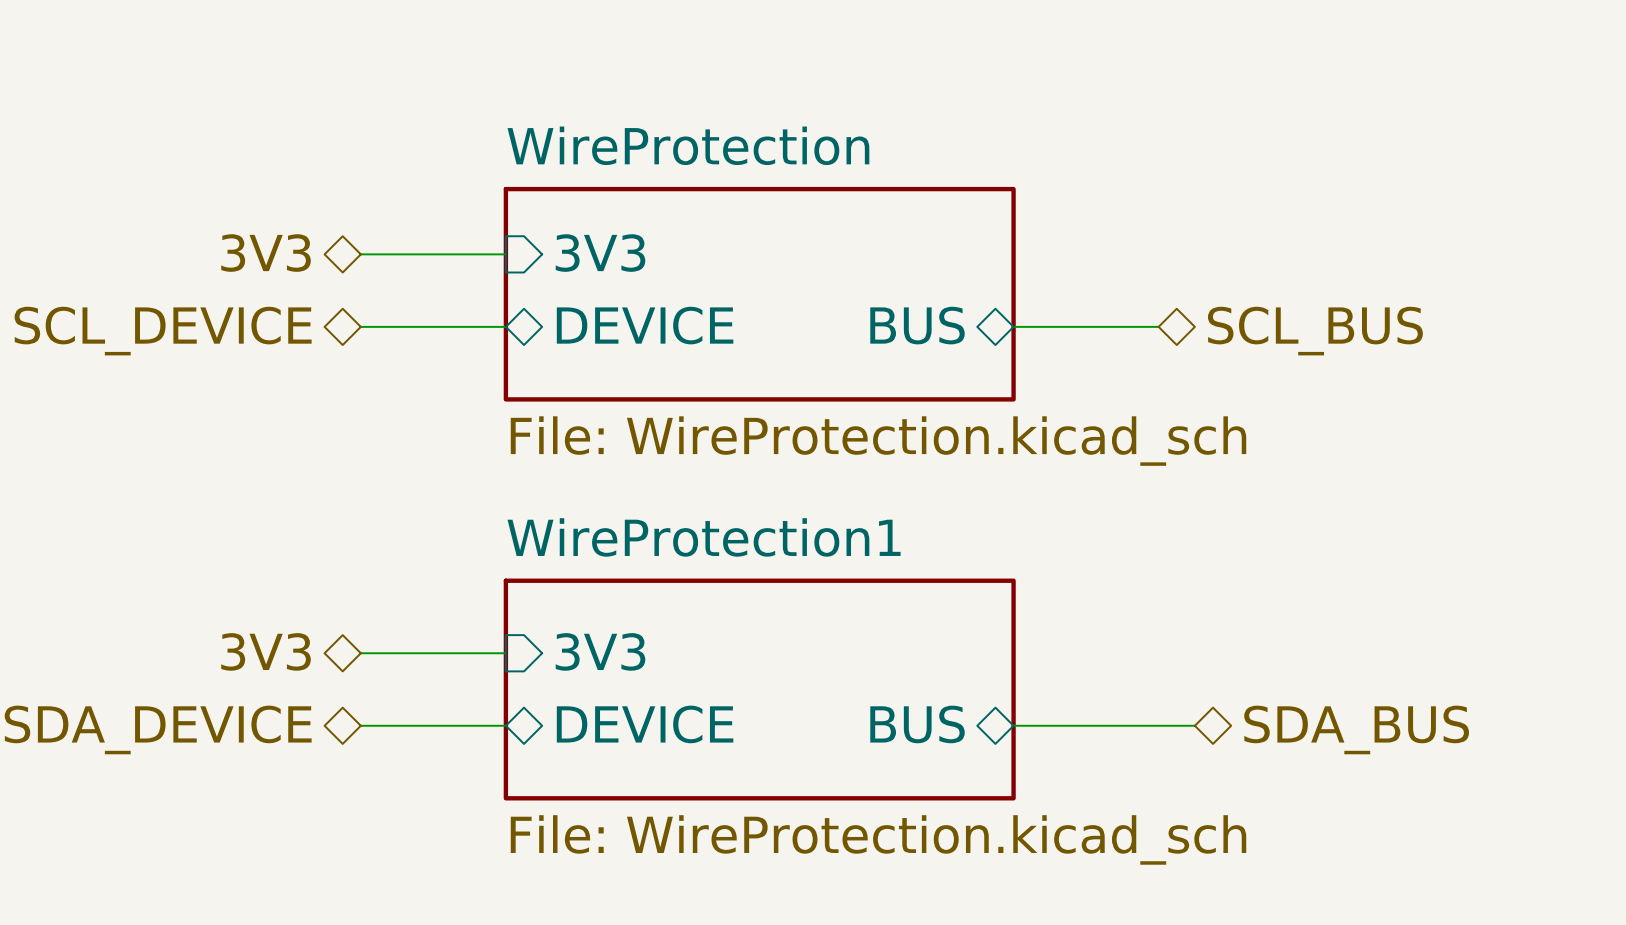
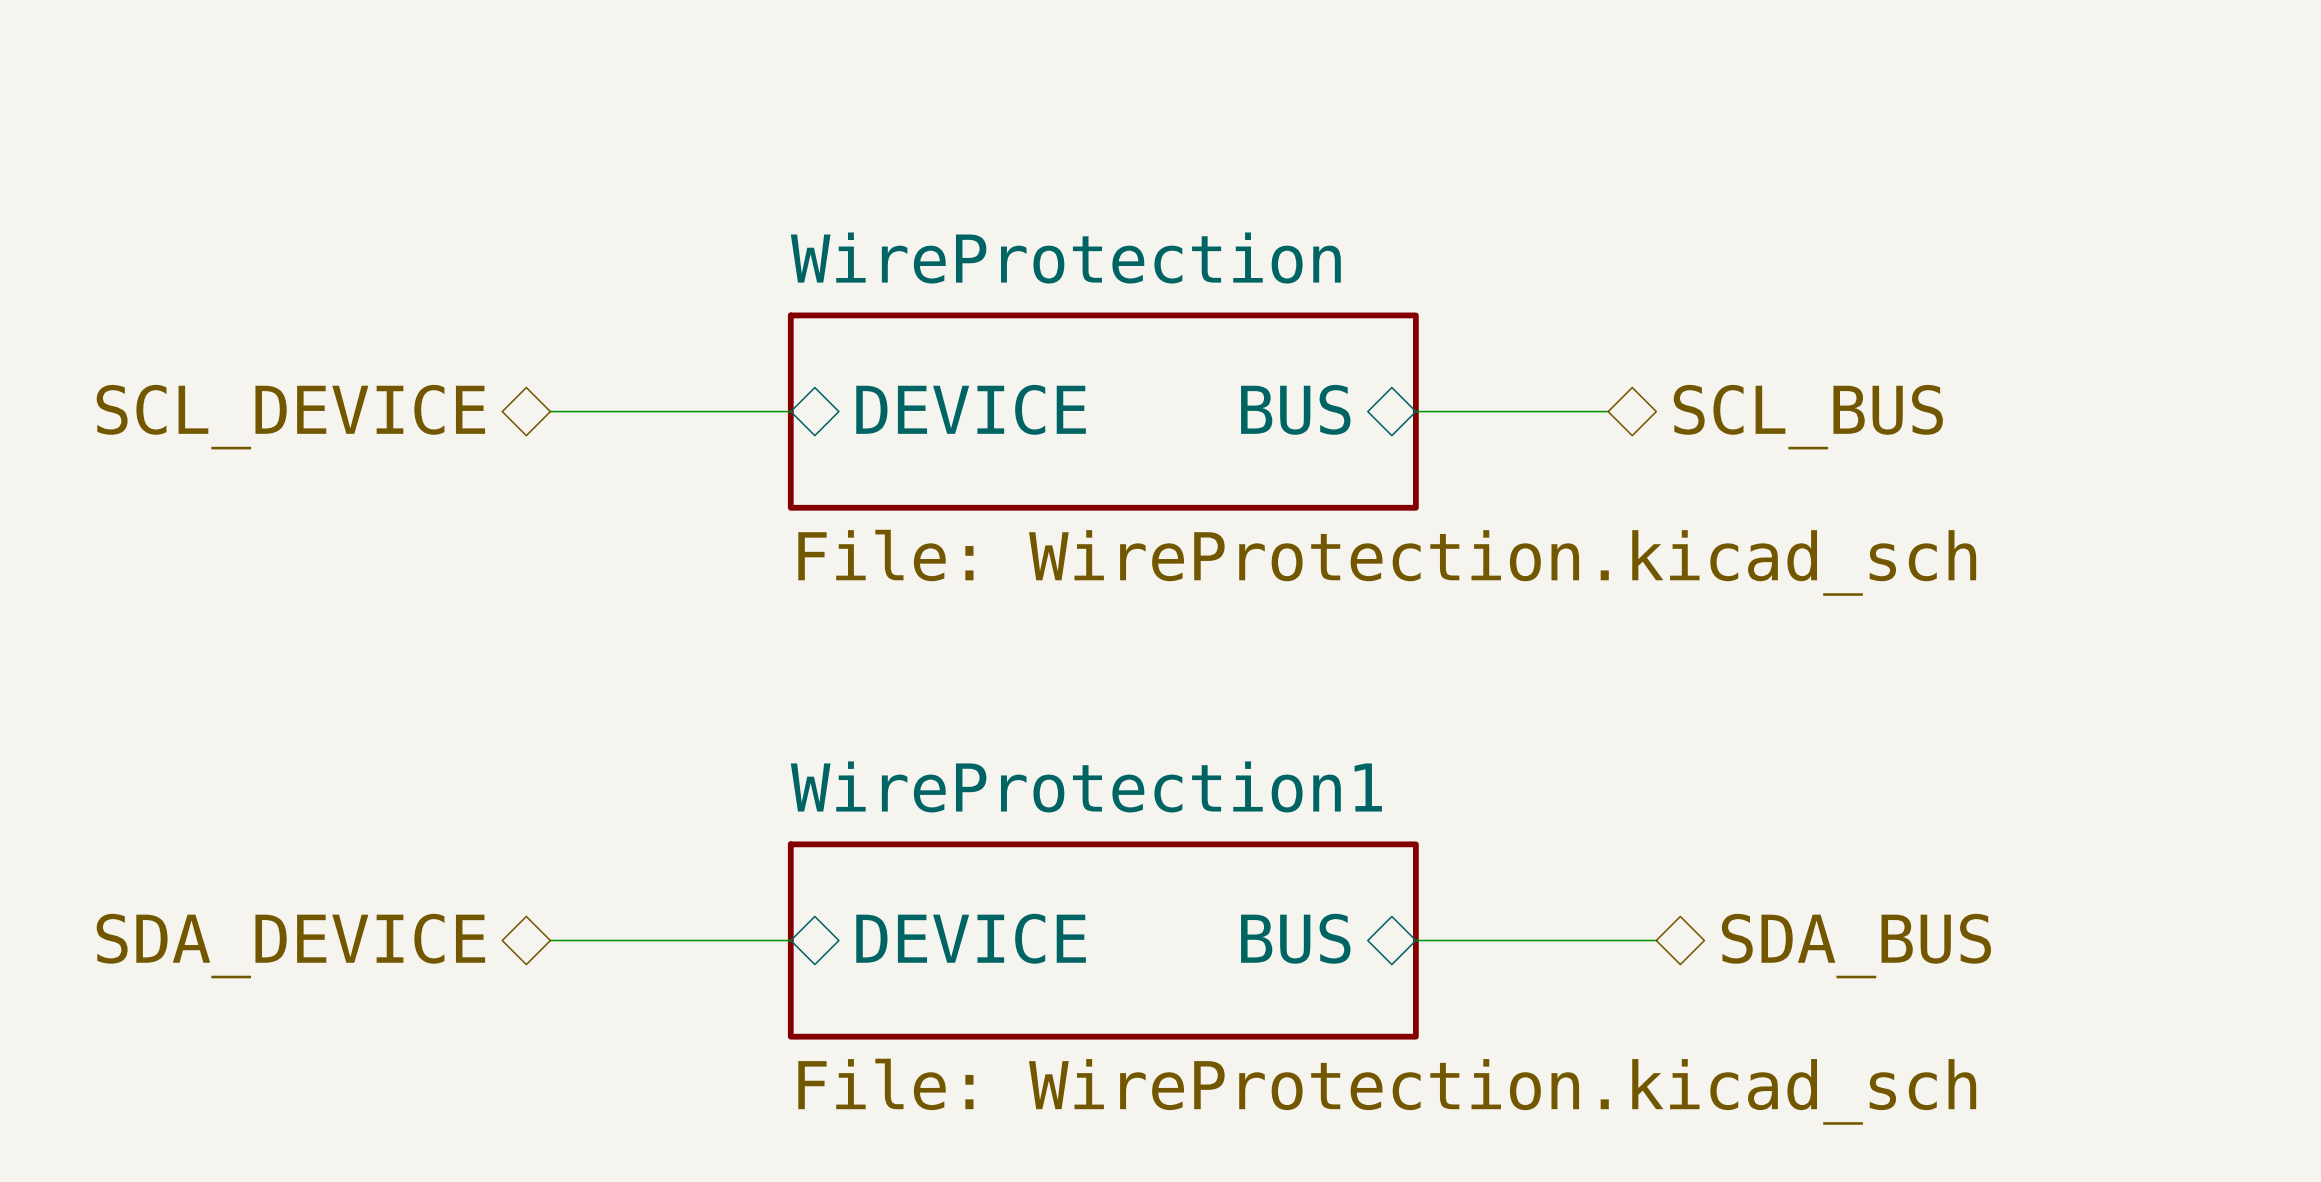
hierarchical label: 3V3 (266, 253) -> none
sheet pin: 3V3 (600, 253) -> none
wire: (360, 254) (505, 254) -> none
sheet WireProtection: File: WireProtection.kicad_sch (759, 294) -> none
sheet pin position: DEVICE (645, 325) -> DEVICE (971, 409)
wire: none -> (742, 411) (790, 411)
sheet WireProtection: none -> File: WireProtection.kicad_sch (1103, 411)
sheet WireProtection1 shape: [503, 578, 1016, 801] -> [787, 841, 1419, 1040]
hierarchical label: 3V3 (266, 651) -> none
sheet pin: 3V3 (600, 651) -> none
wire: (360, 653) (505, 653) -> none
sheet pin position: DEVICE (645, 724) -> DEVICE (971, 938)
wire: none -> (742, 940) (790, 940)

